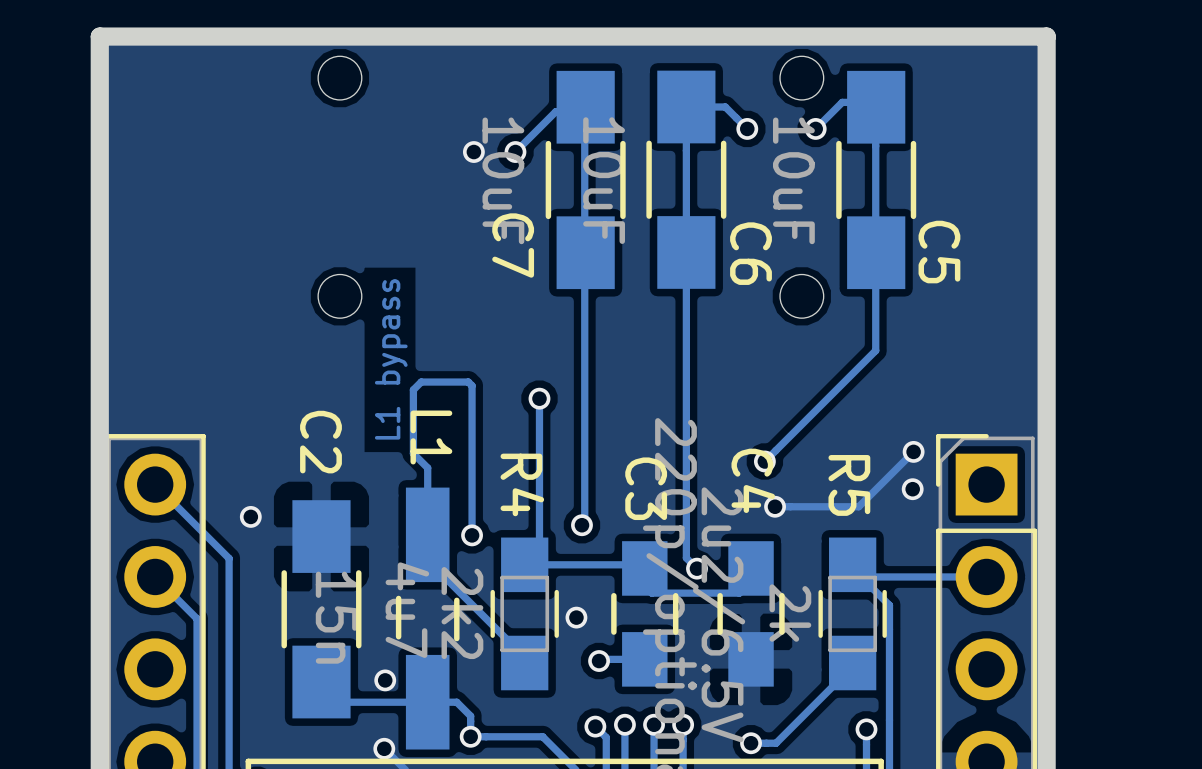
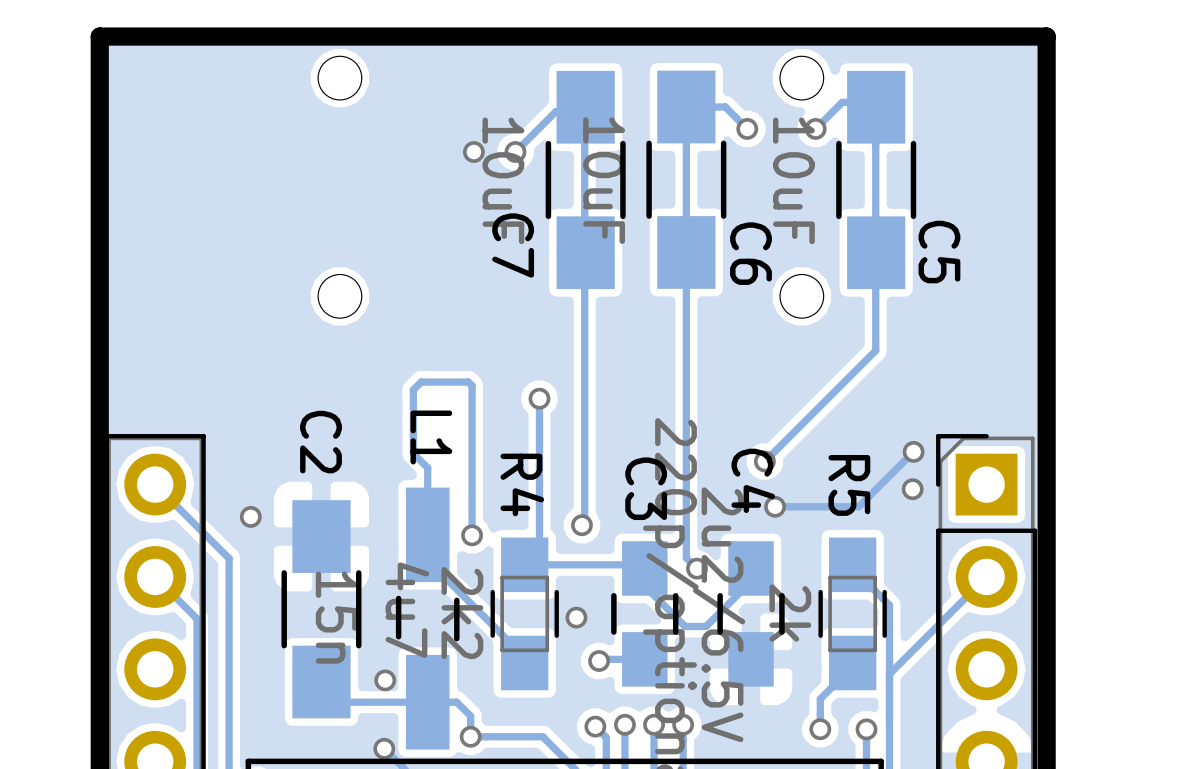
text: L1 bypass (391, 359) -> none
track: (852, 564) (864, 576) (986, 576) -> (889, 674) (986, 576)
track: (739, 593) (651, 593) -> (739, 593) (706, 626) (685, 626) (651, 593)
track: (820, 698) (776, 743) (751, 743) -> (820, 698) (820, 729)
via position: (751, 743) -> (820, 729)

